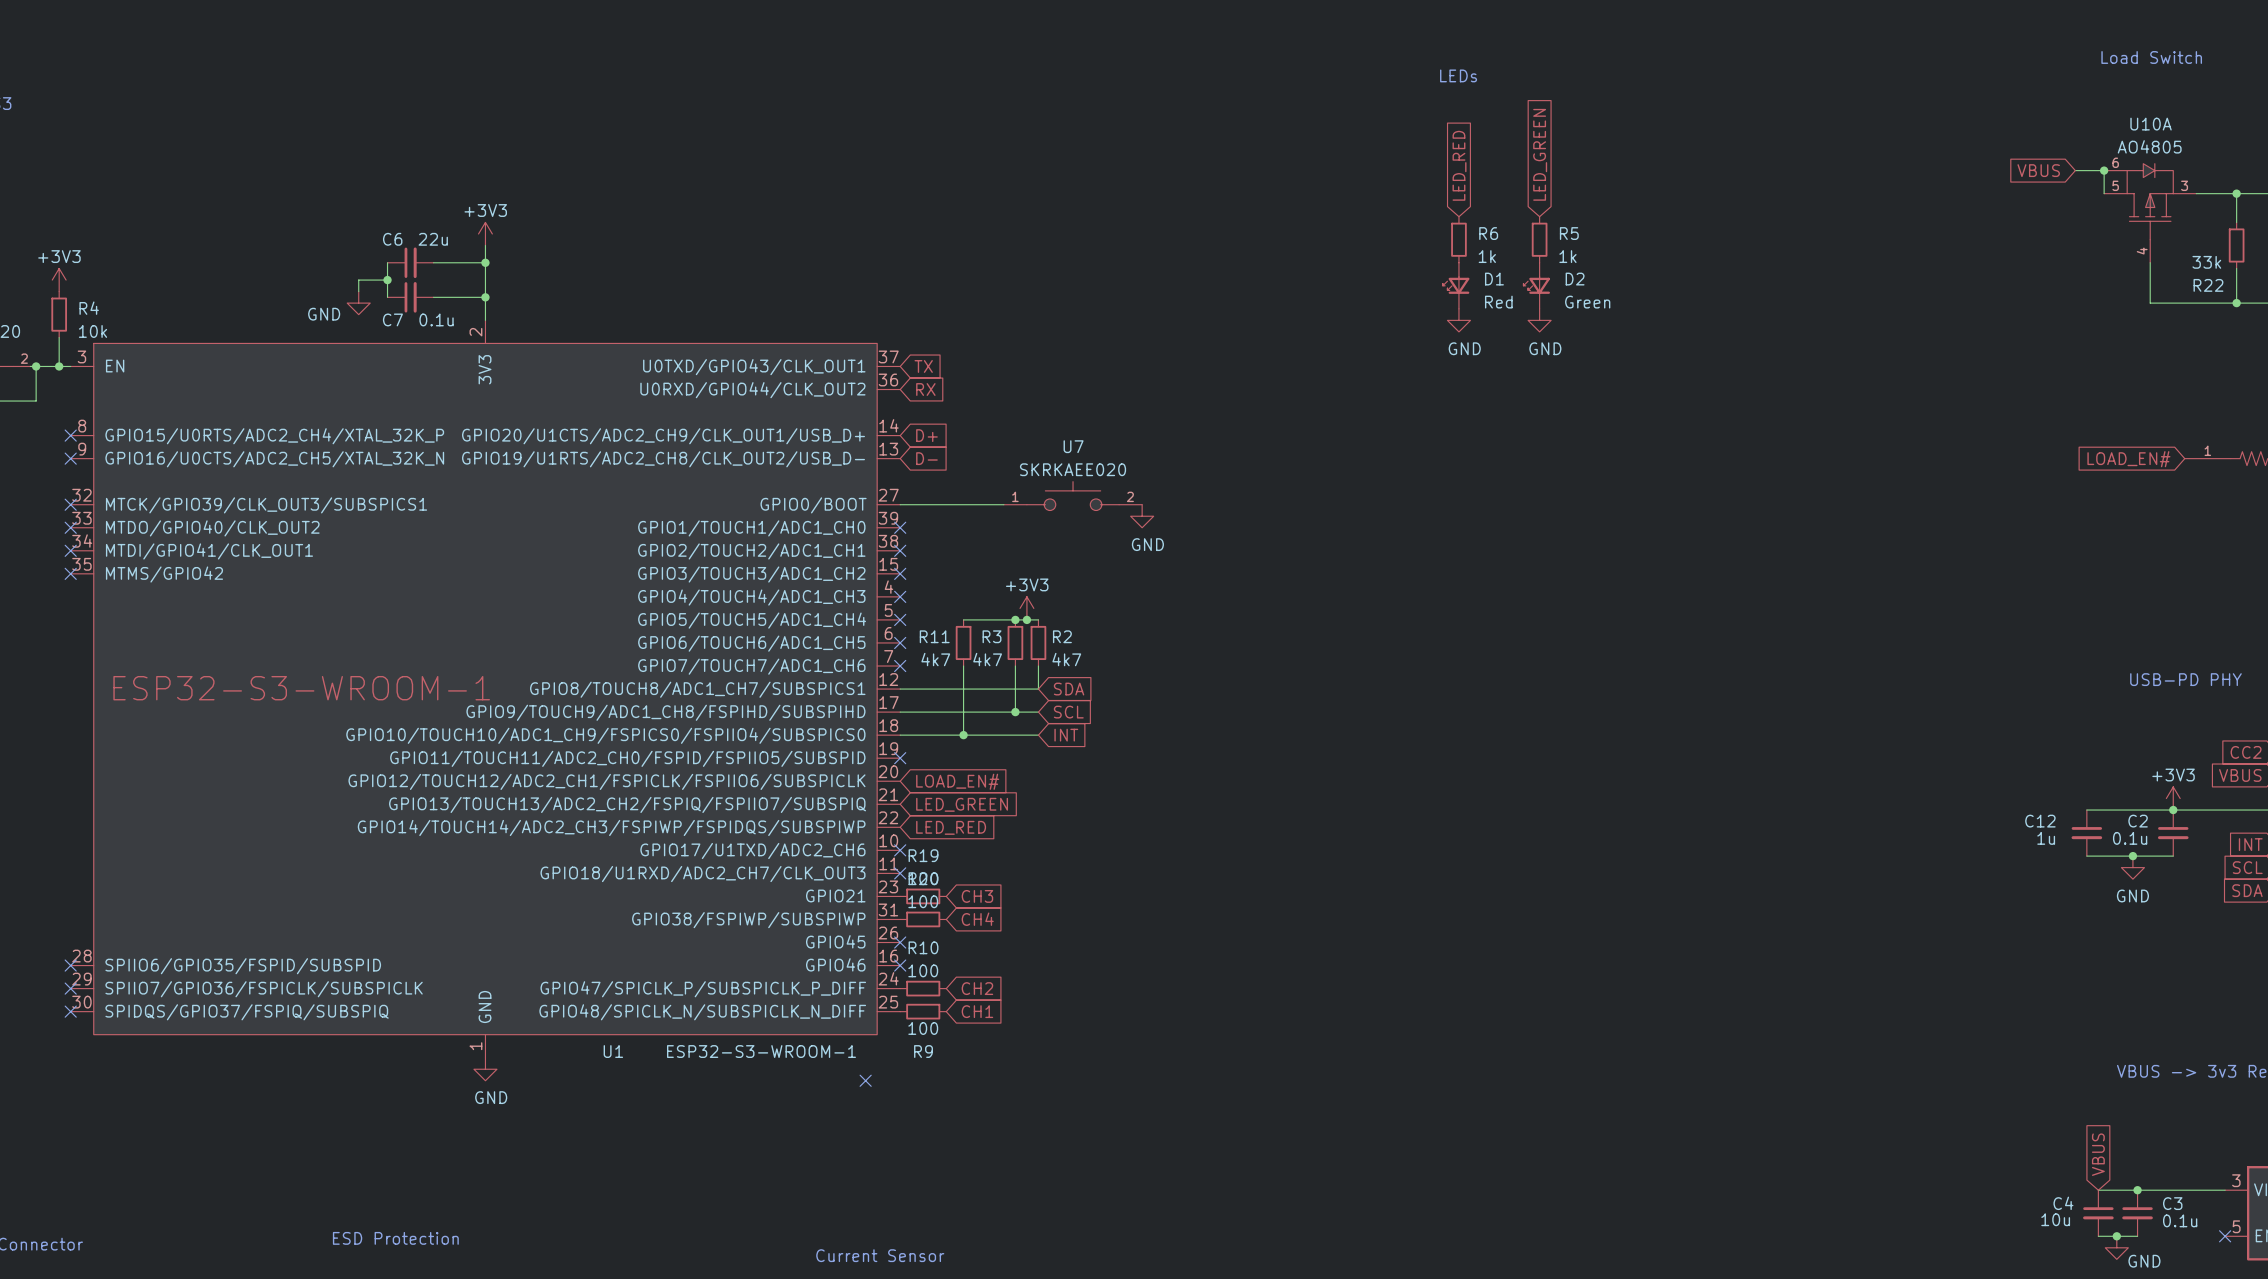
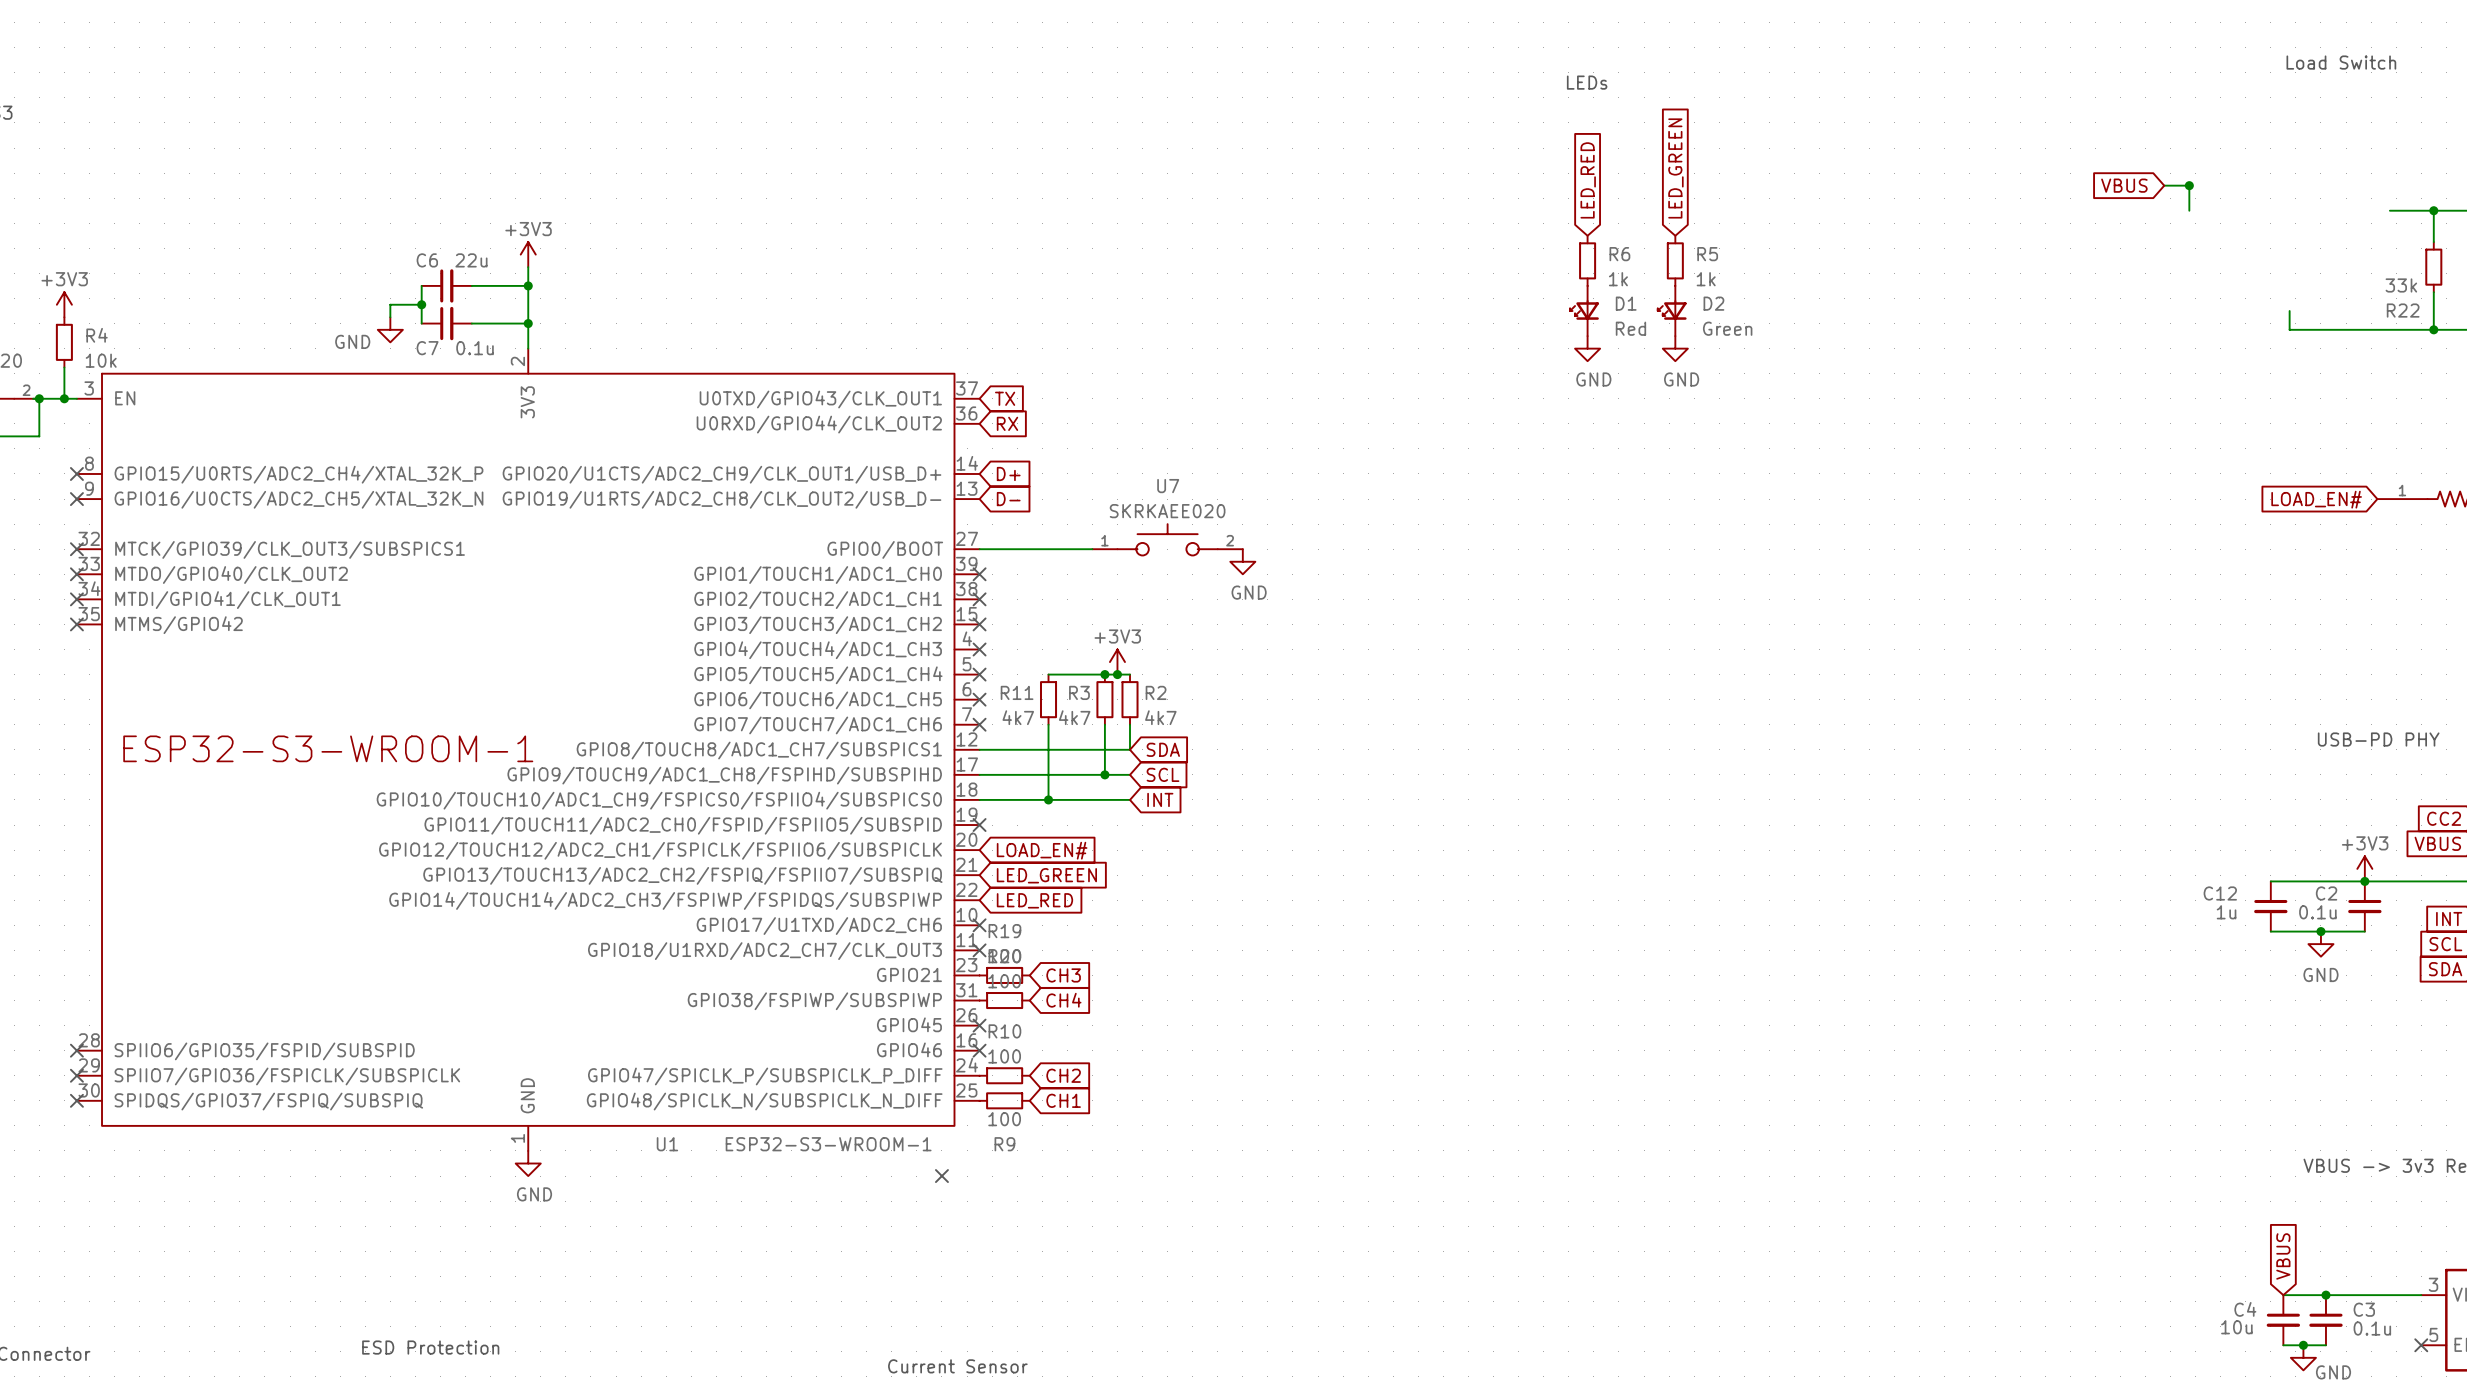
wire: none -> (2164, 185) (2189, 185) (2189, 210)
junction: none -> (2189, 185)
global label position: VBUS (2038, 170) -> VBUS (2124, 185)
wire: (2075, 170) (2104, 170) (2104, 193) -> none
junction: (2104, 170) -> none
U10A: AO4805 (2150, 213) -> none
wire: (2150, 262) (2150, 303) -> (2289, 311) (2289, 329) (2339, 329)

